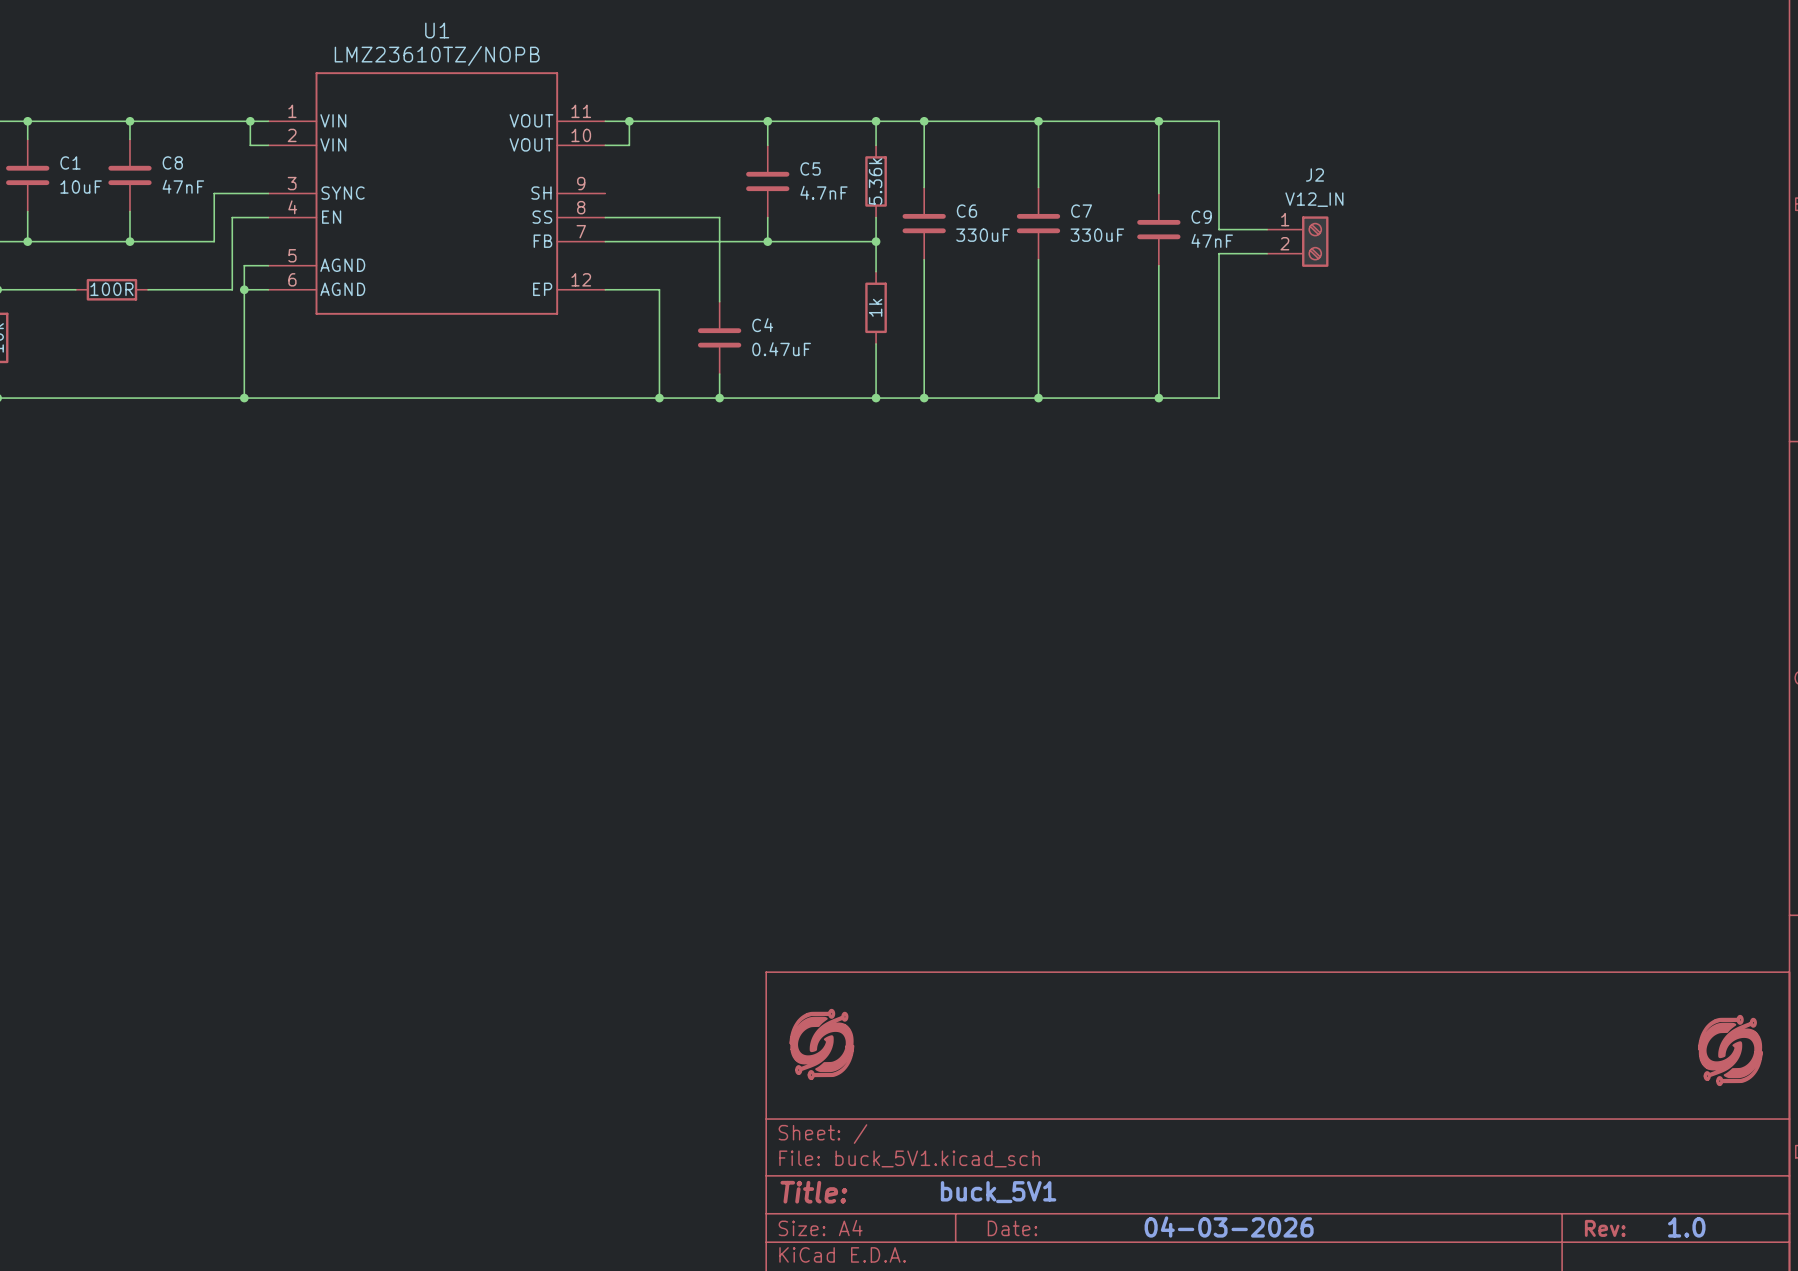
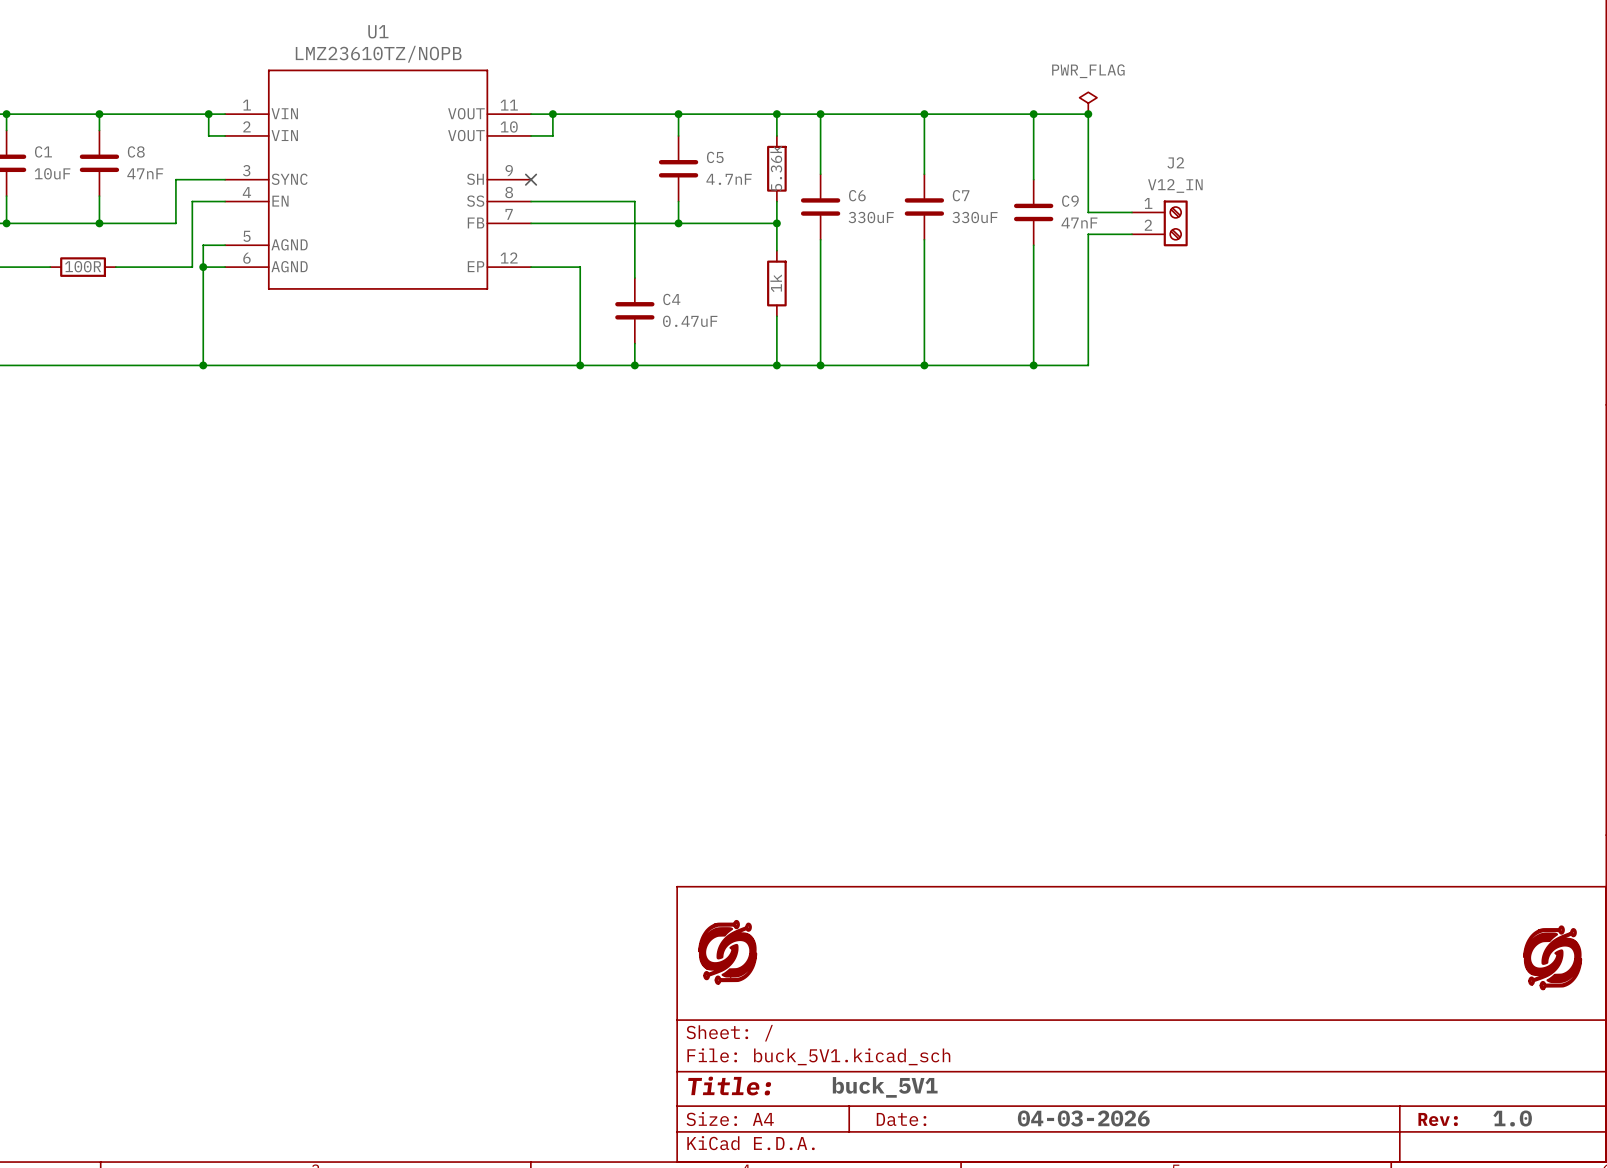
power symbol: none -> PWR_FLAG (1088, 103)
junction: none -> (1088, 114)
no-connect mark: none -> (531, 179)

